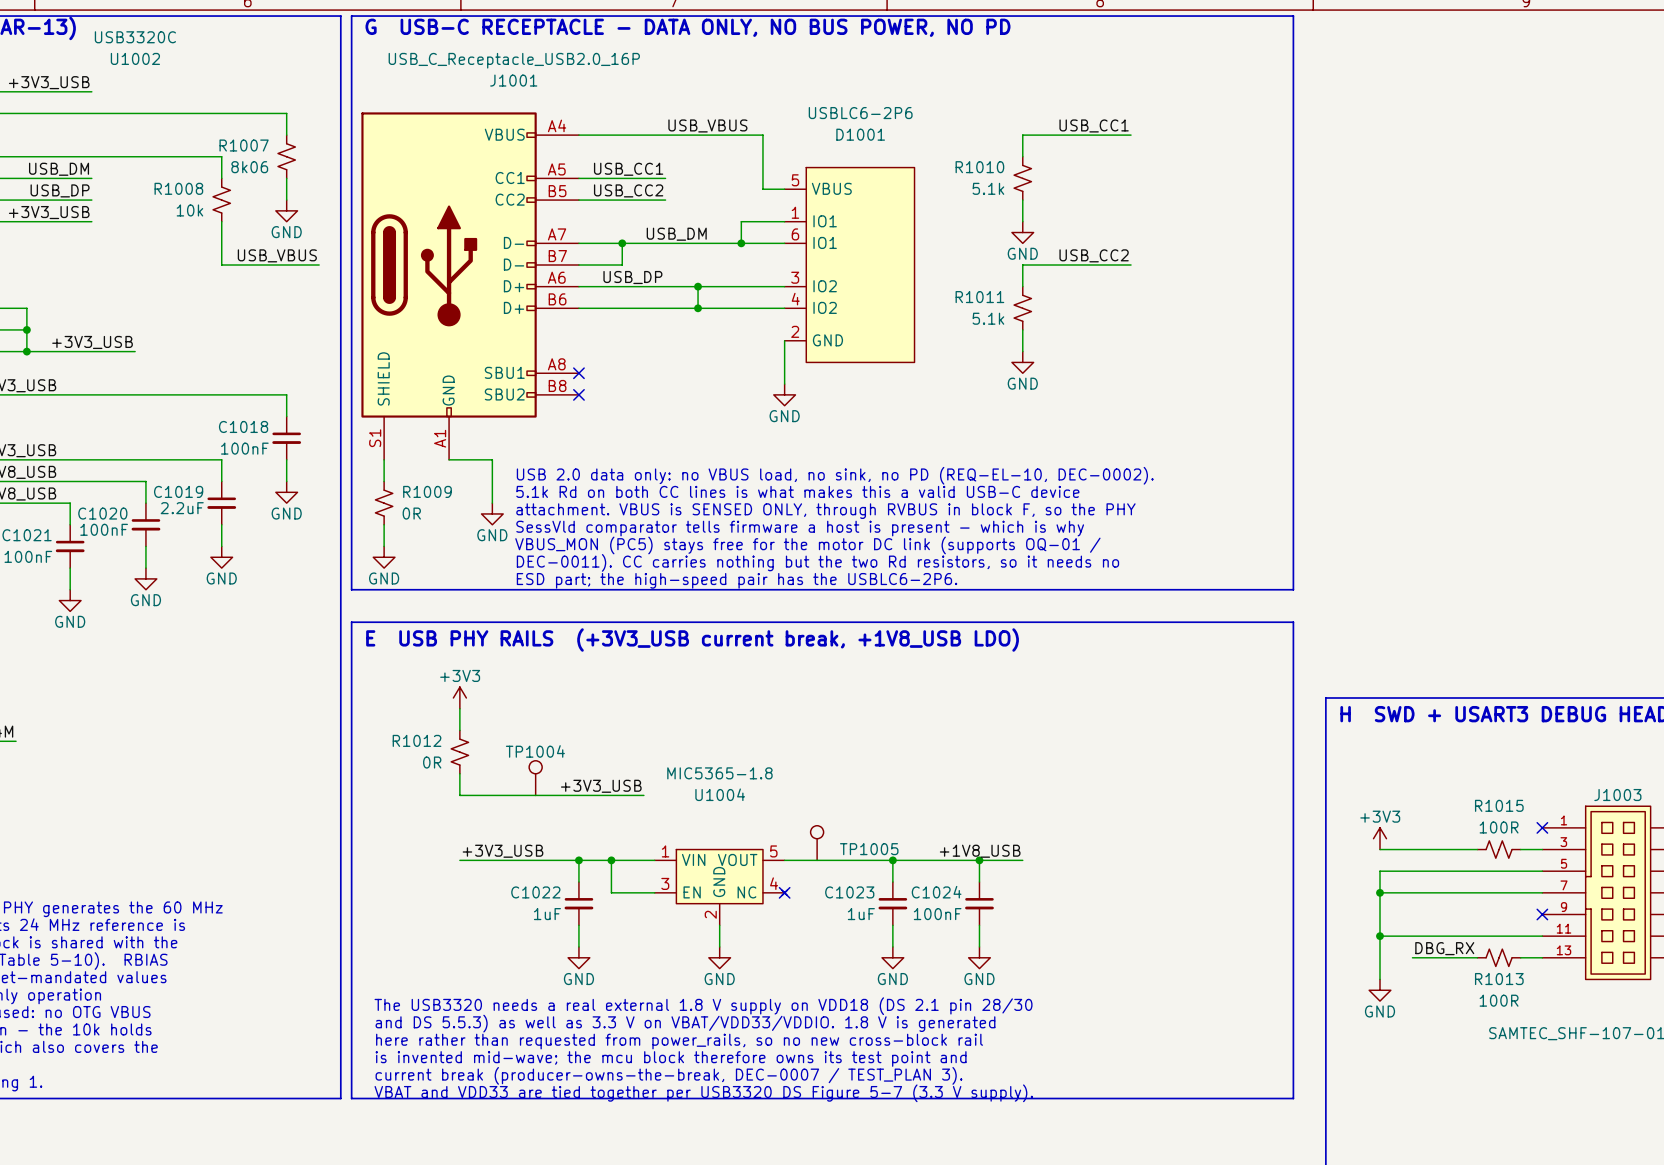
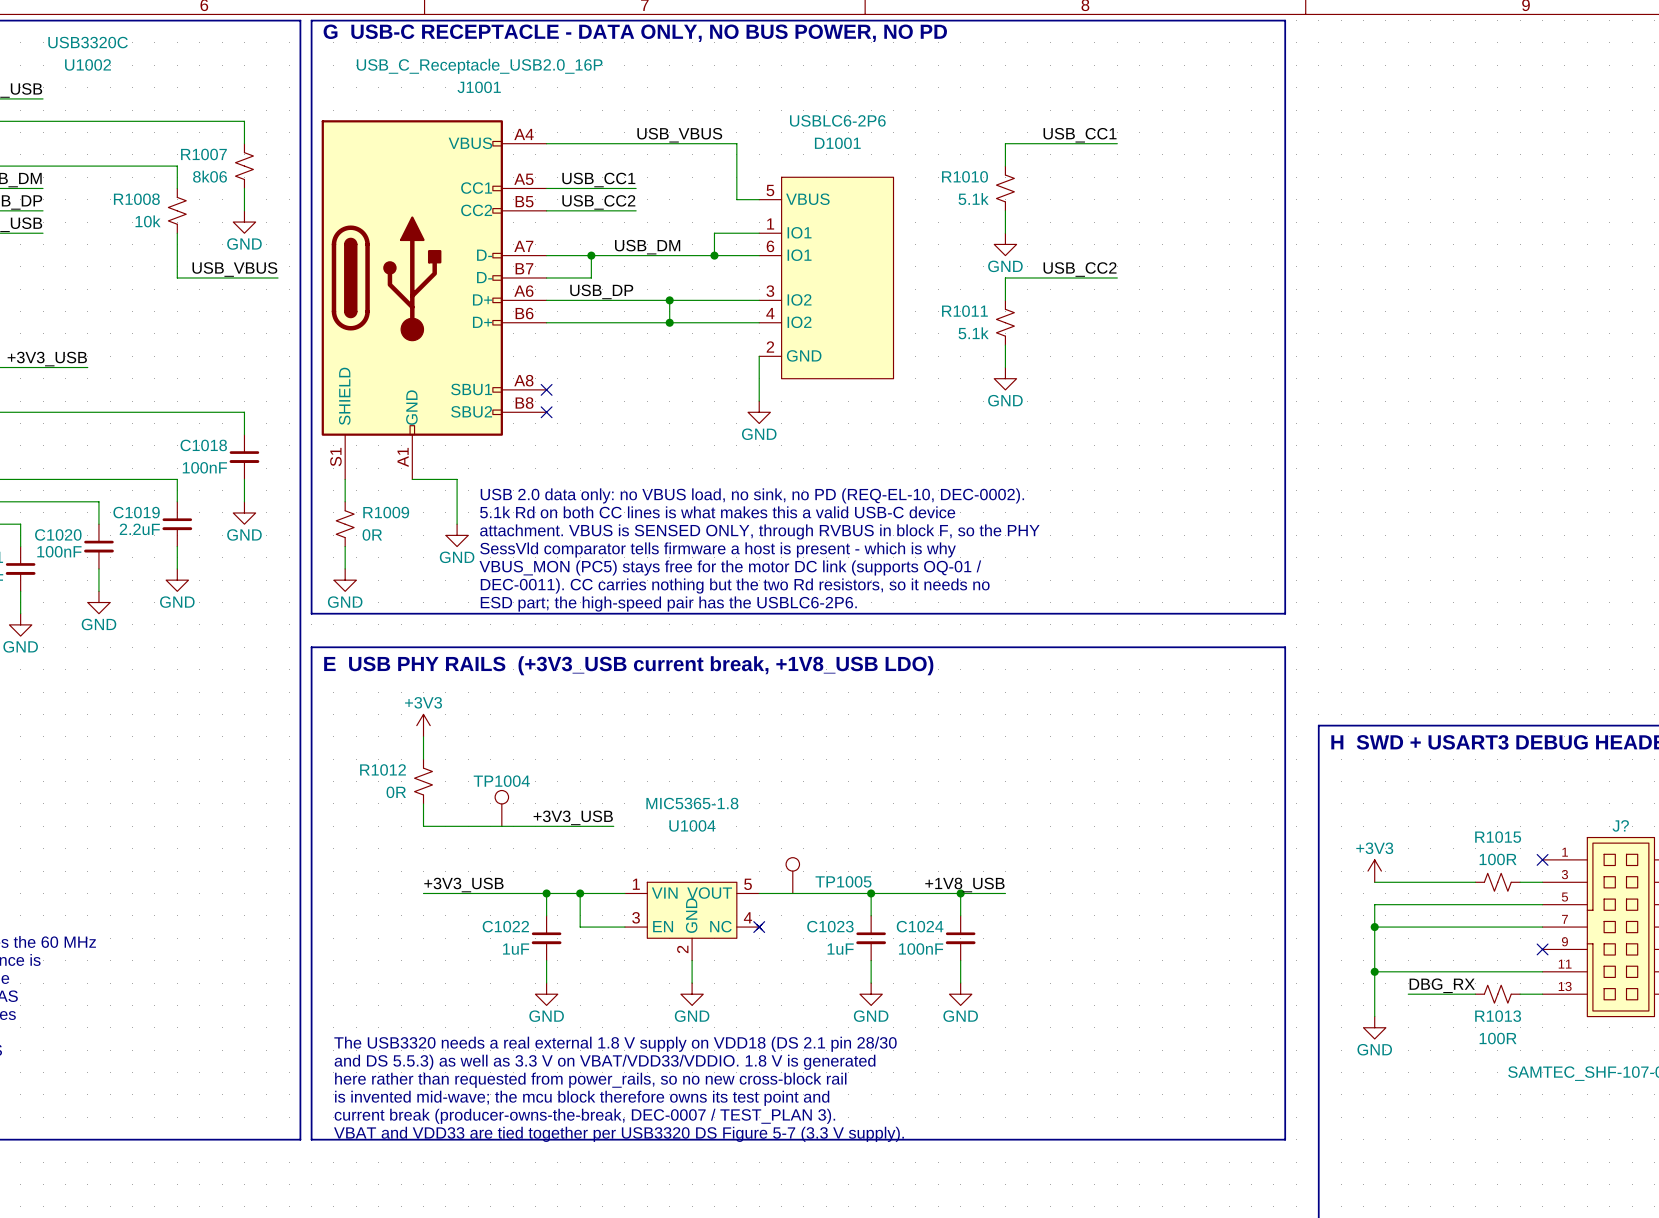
J1003 name: J1003 (1617, 795) -> J? (1620, 825)

